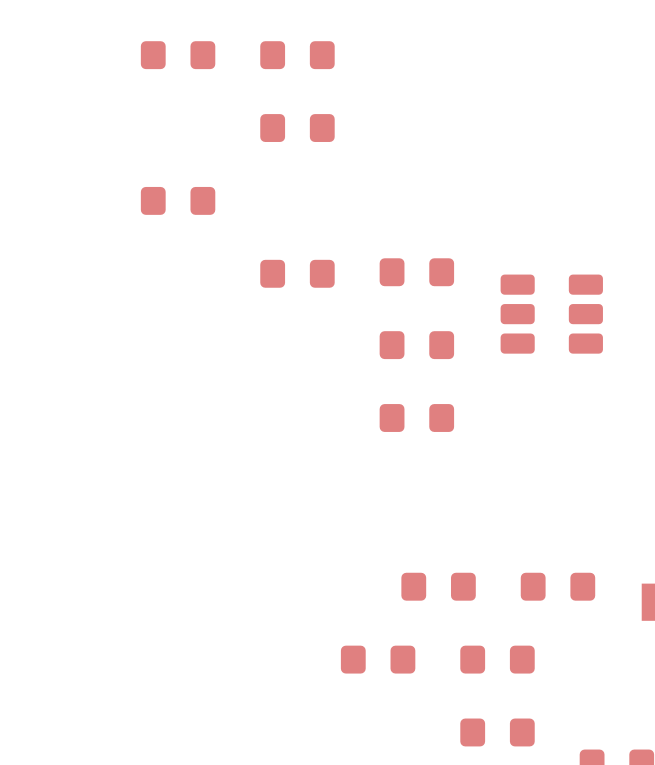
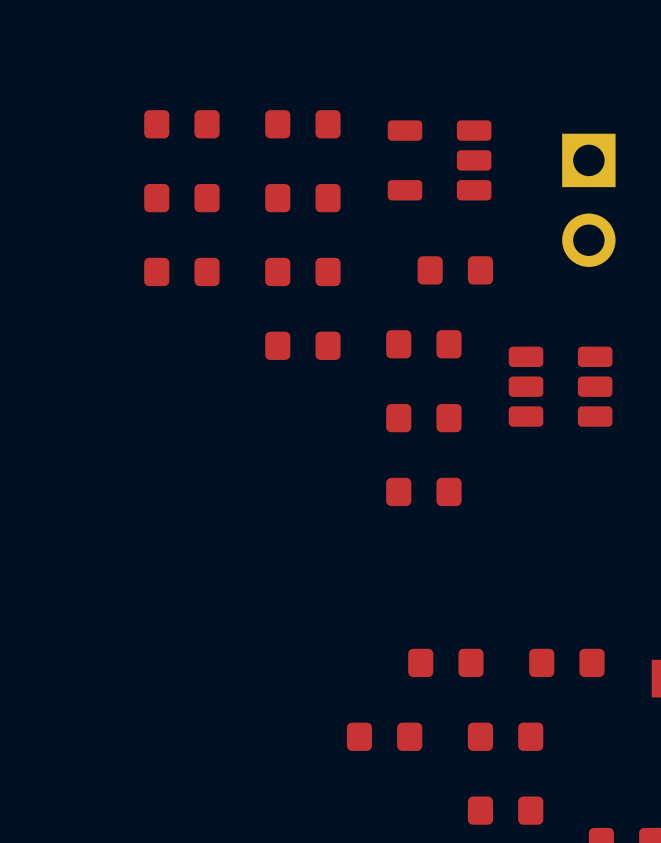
part: none -> (439, 160)
part: none -> (181, 198)
part: none -> (588, 200)
part: none -> (455, 270)
part: none -> (302, 271)

